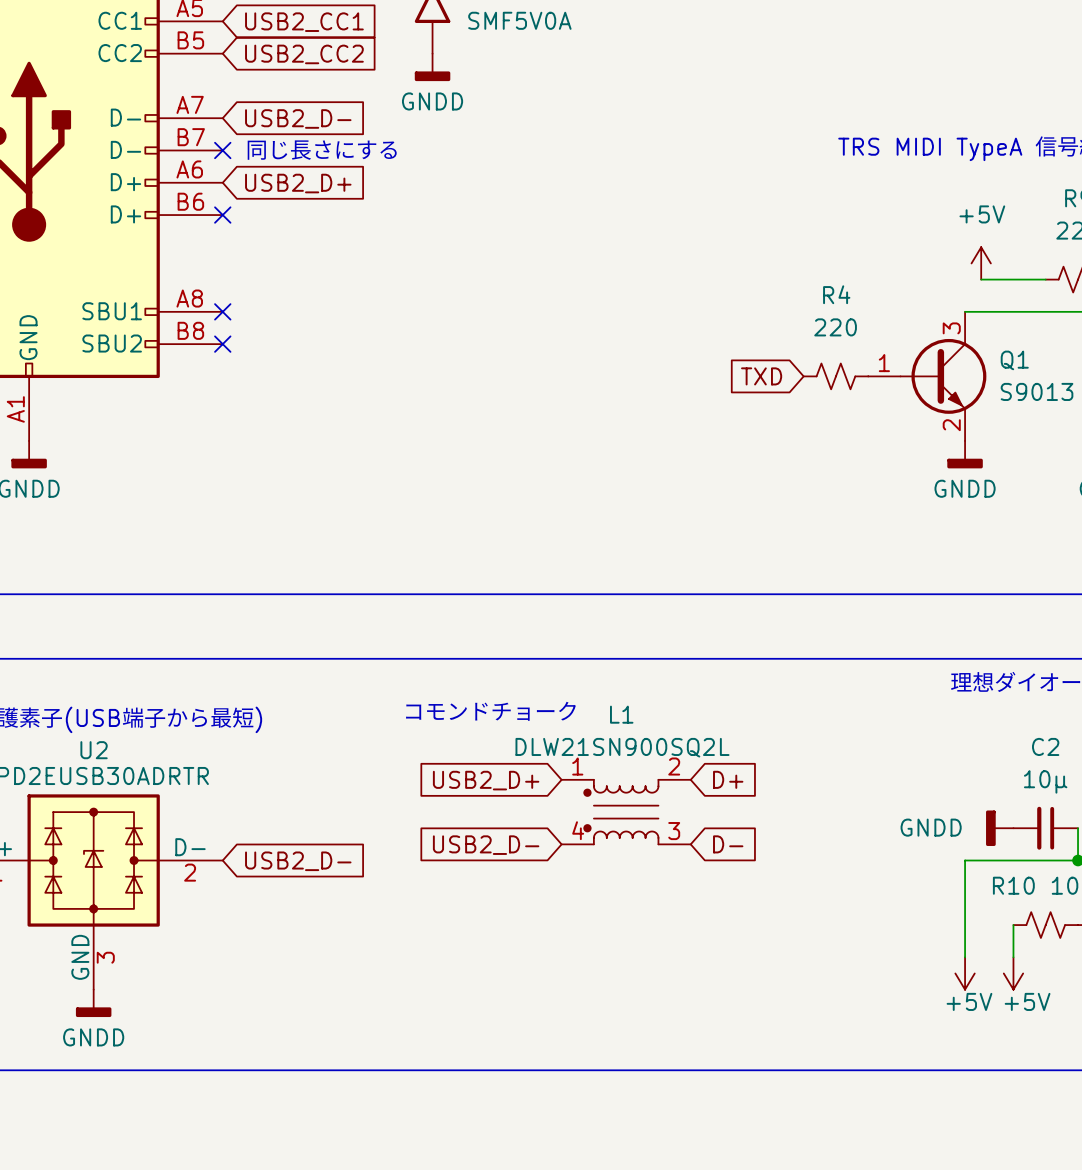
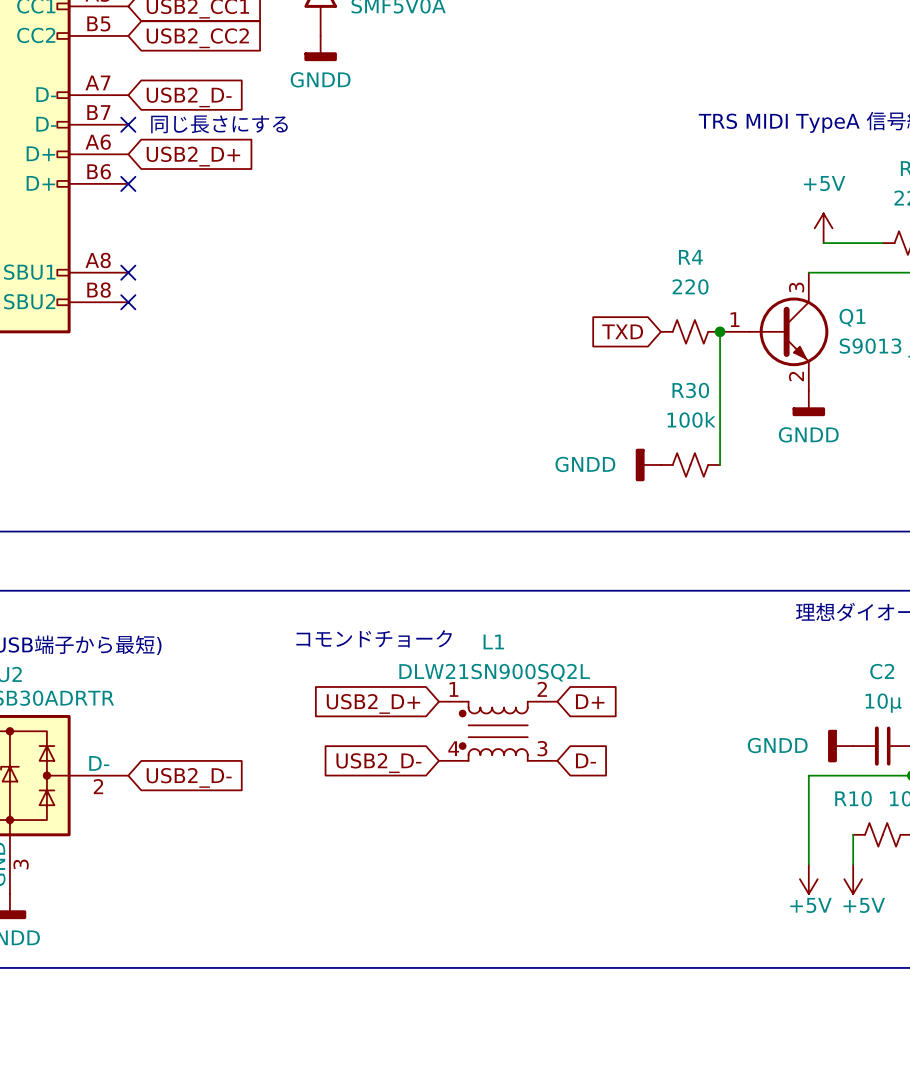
wire: none -> (720, 331) (720, 464)
junction: none -> (720, 331)
power symbol: none -> GNDD (648, 464)
R30: none -> 100k (690, 464)

